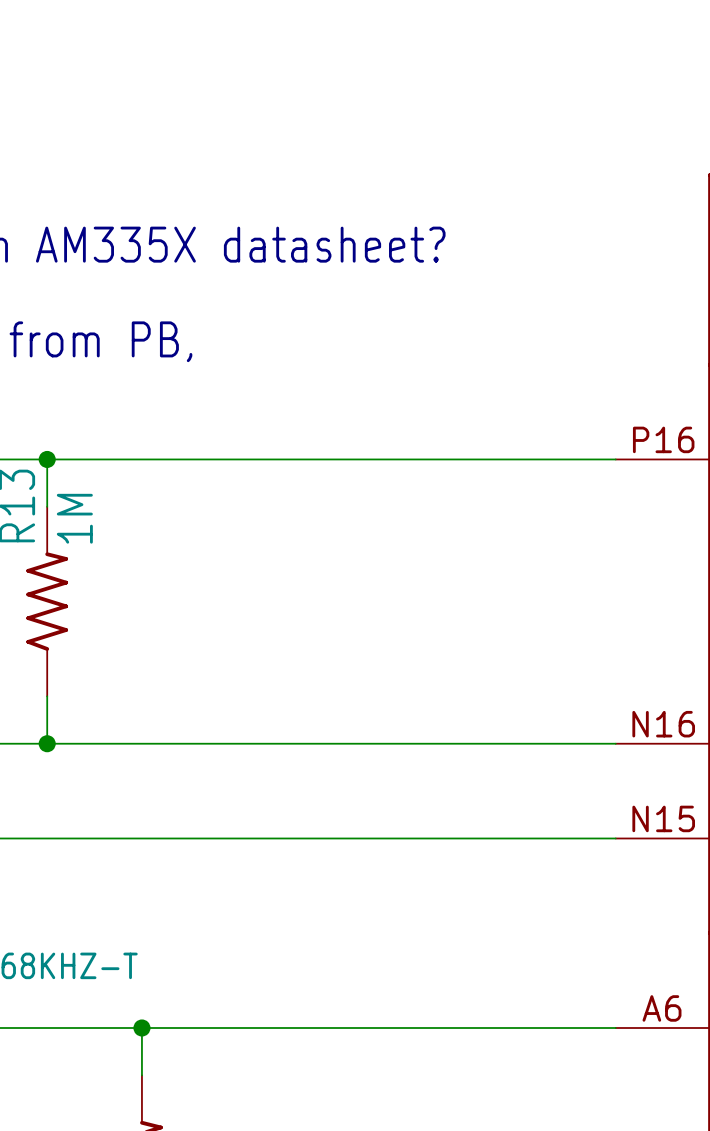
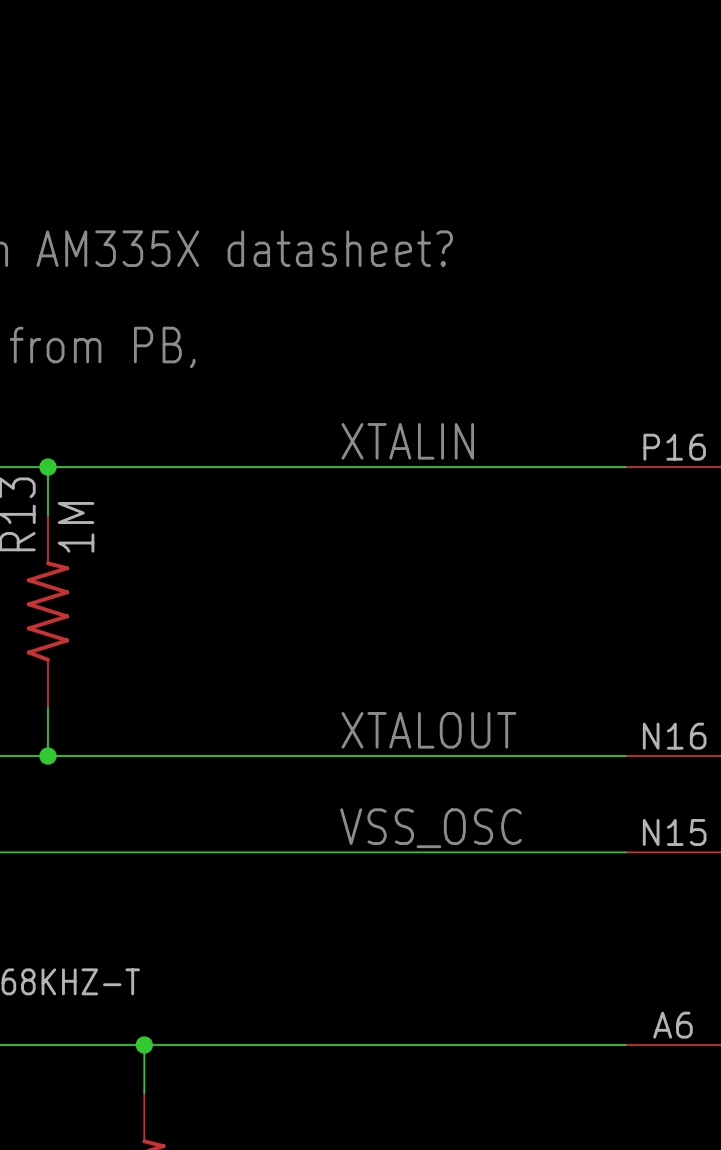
text: none -> XTALIN (407, 441)
text: none -> XTALOUT (428, 730)
text: none -> VSS_OSC (430, 828)

